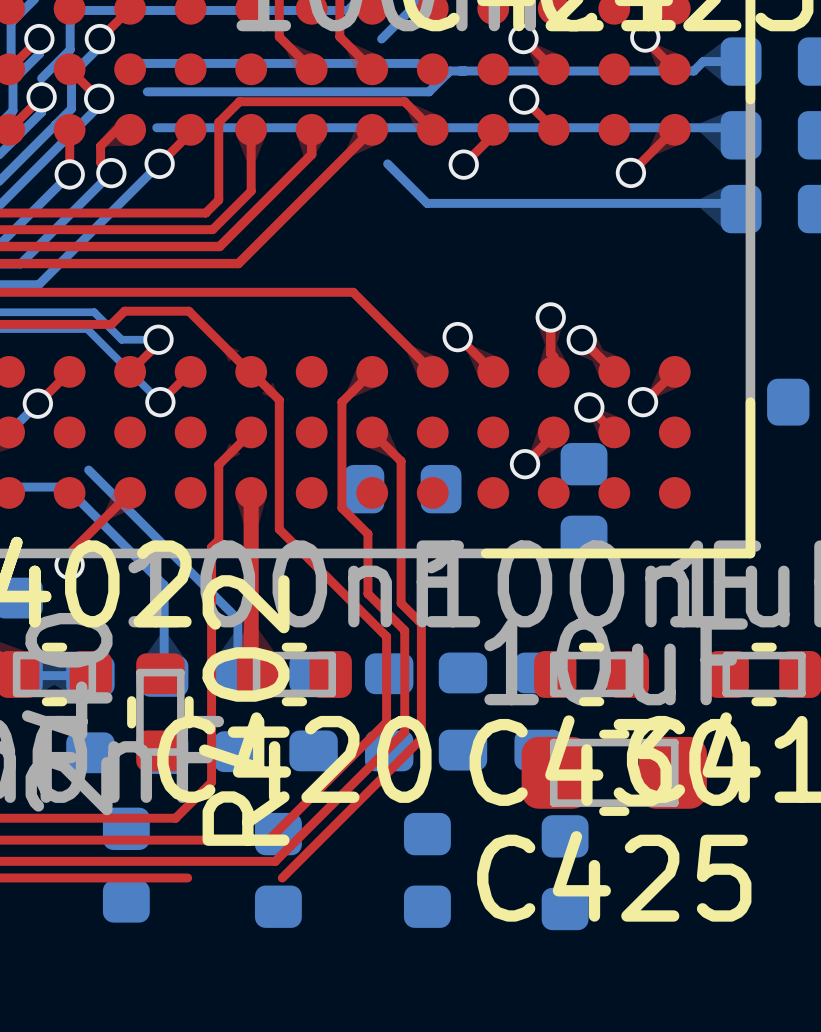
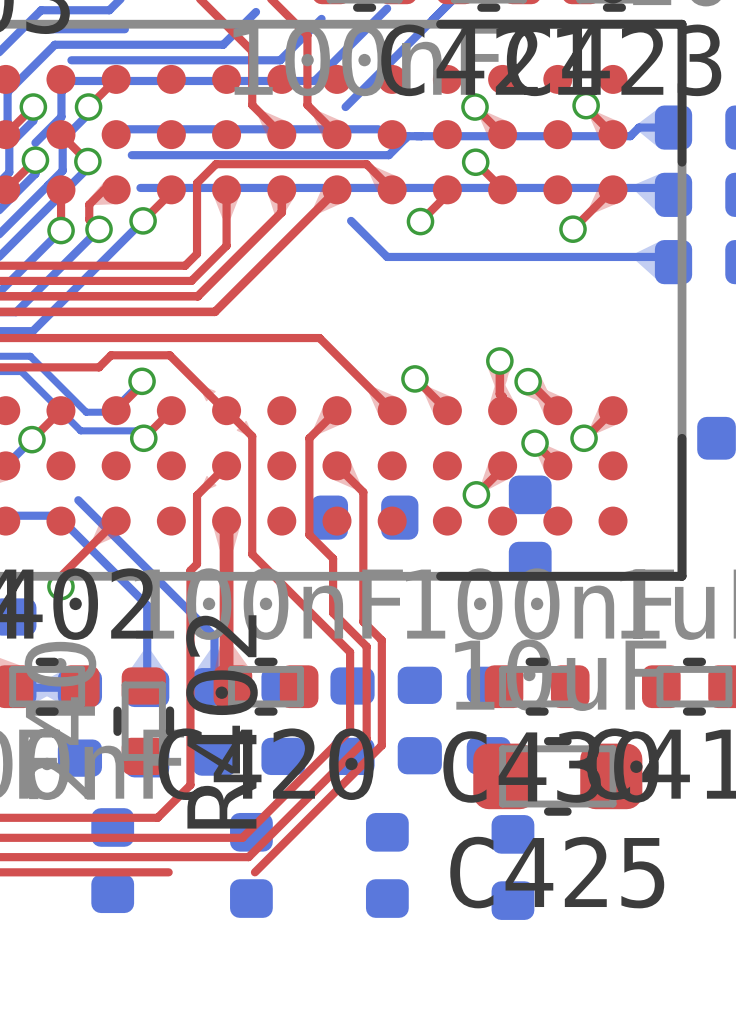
bottom track: (36, 312) (94, 312) (121, 339) (158, 339) (150, 339) -> (30, 356) (86, 412) (111, 412) (142, 381)
bottom track: (26, 329) (87, 329) (152, 394) -> (21, 371) (80, 430) (136, 430)

